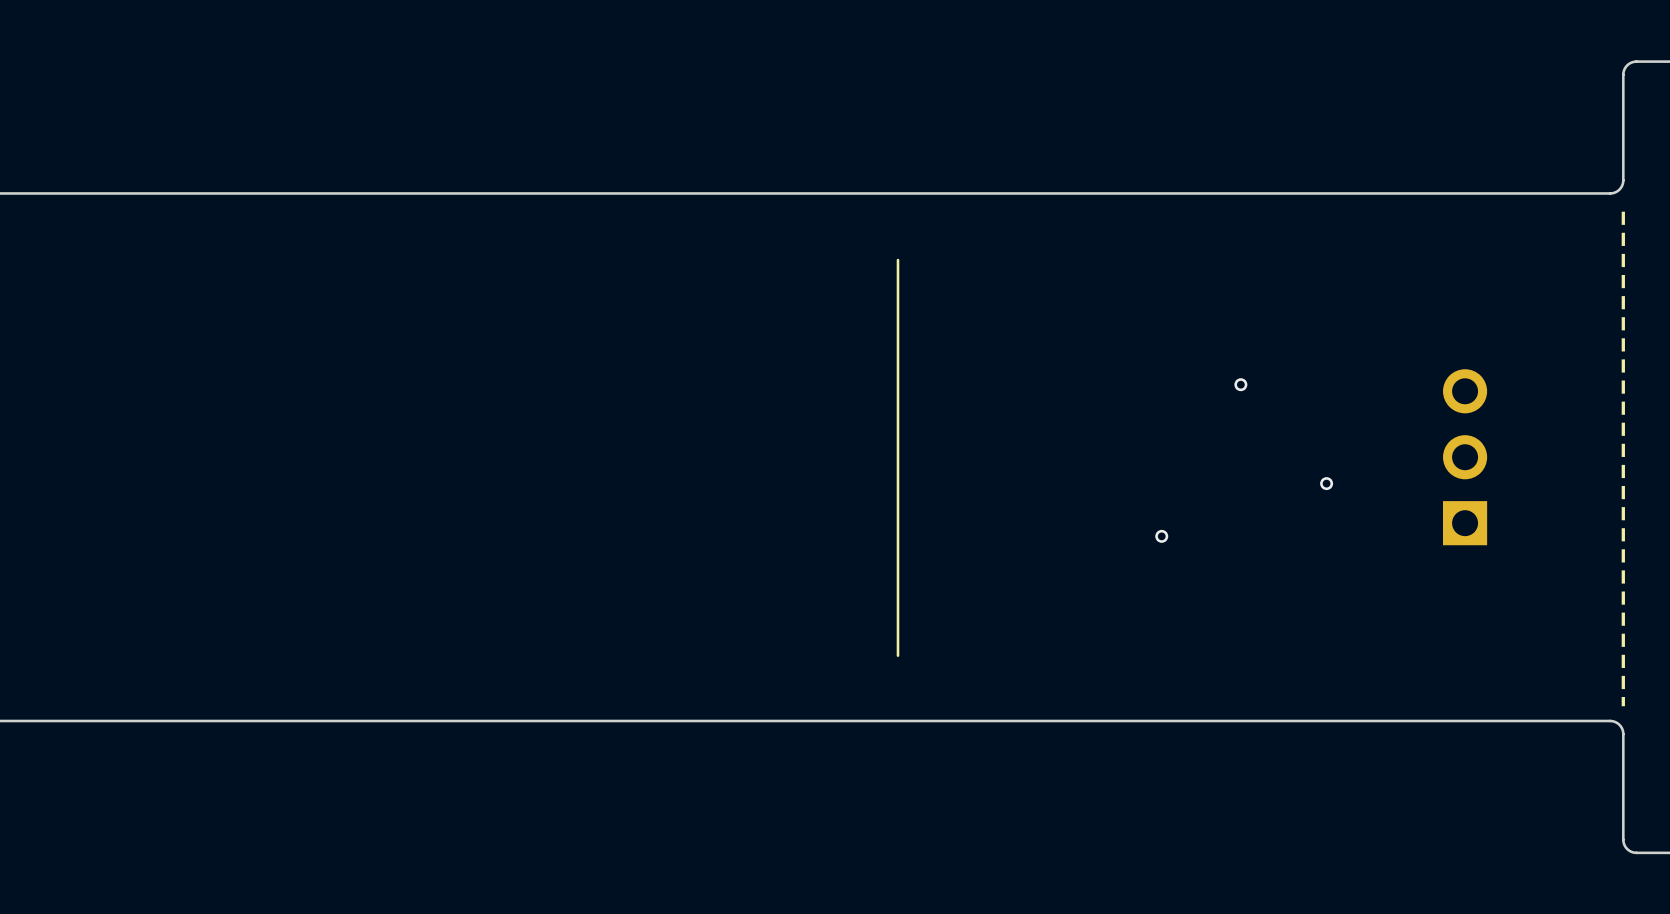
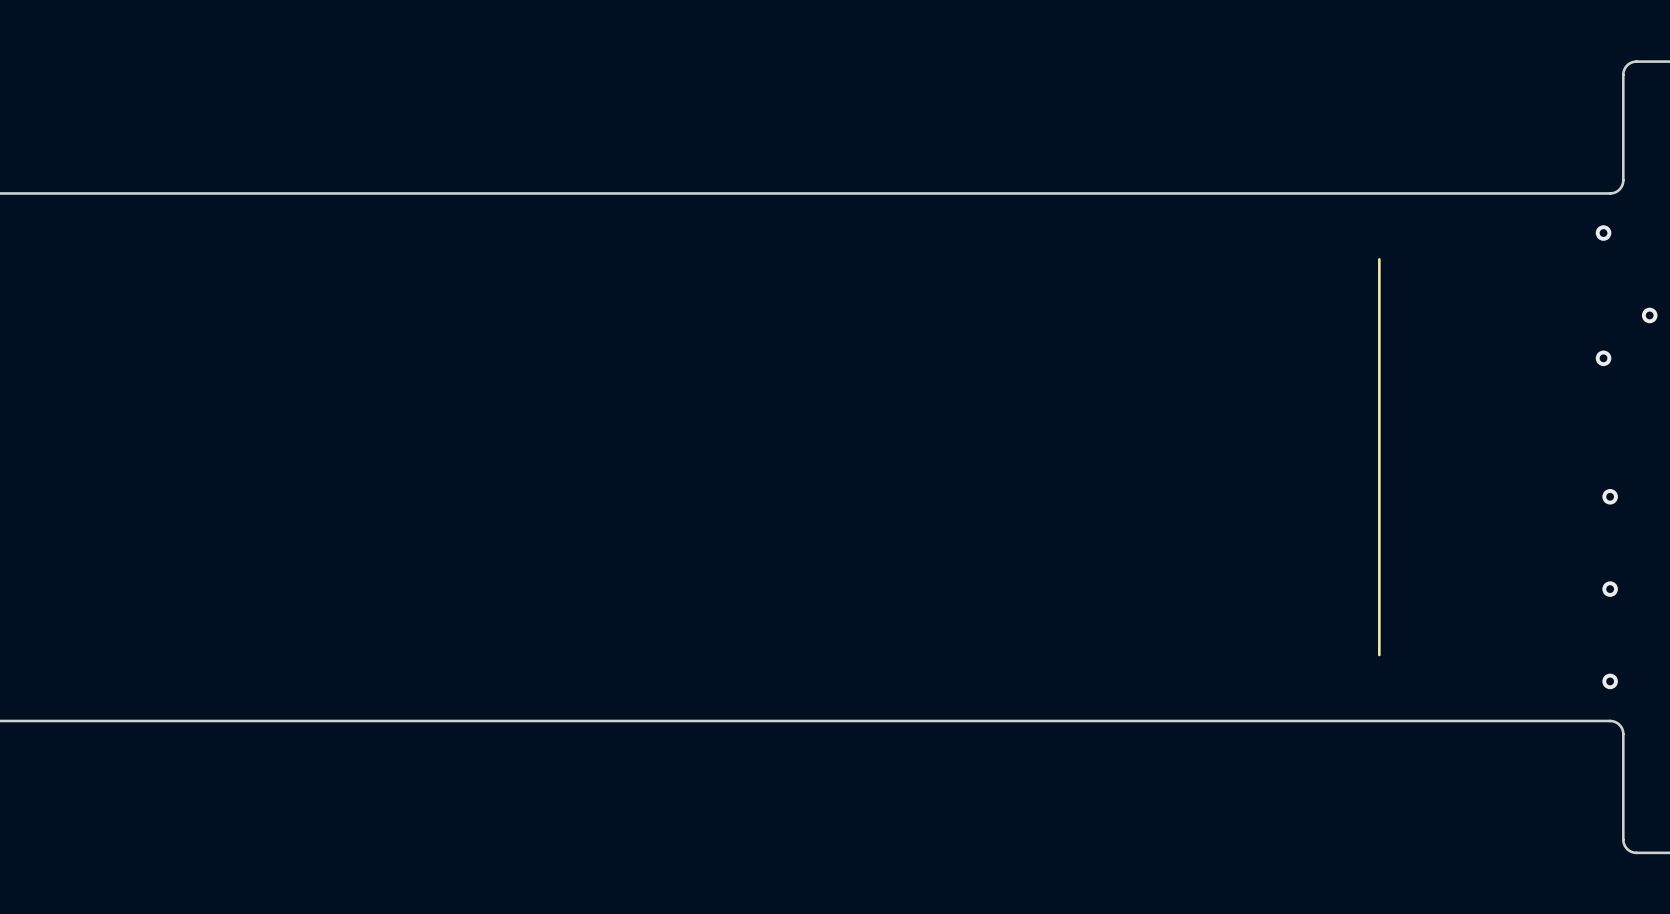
line: (1623, 211) (1623, 706) -> none
via: none -> (1603, 233)
line: (897, 260) (897, 655) -> (1379, 259) (1379, 655)
via: none -> (1649, 315)
via: none -> (1603, 358)
via: (1240, 384) -> none
part: (1465, 457) -> none
via: (1326, 483) -> none
via: none -> (1610, 496)
via: (1161, 536) -> none
via: none -> (1610, 589)
via: none -> (1610, 681)

